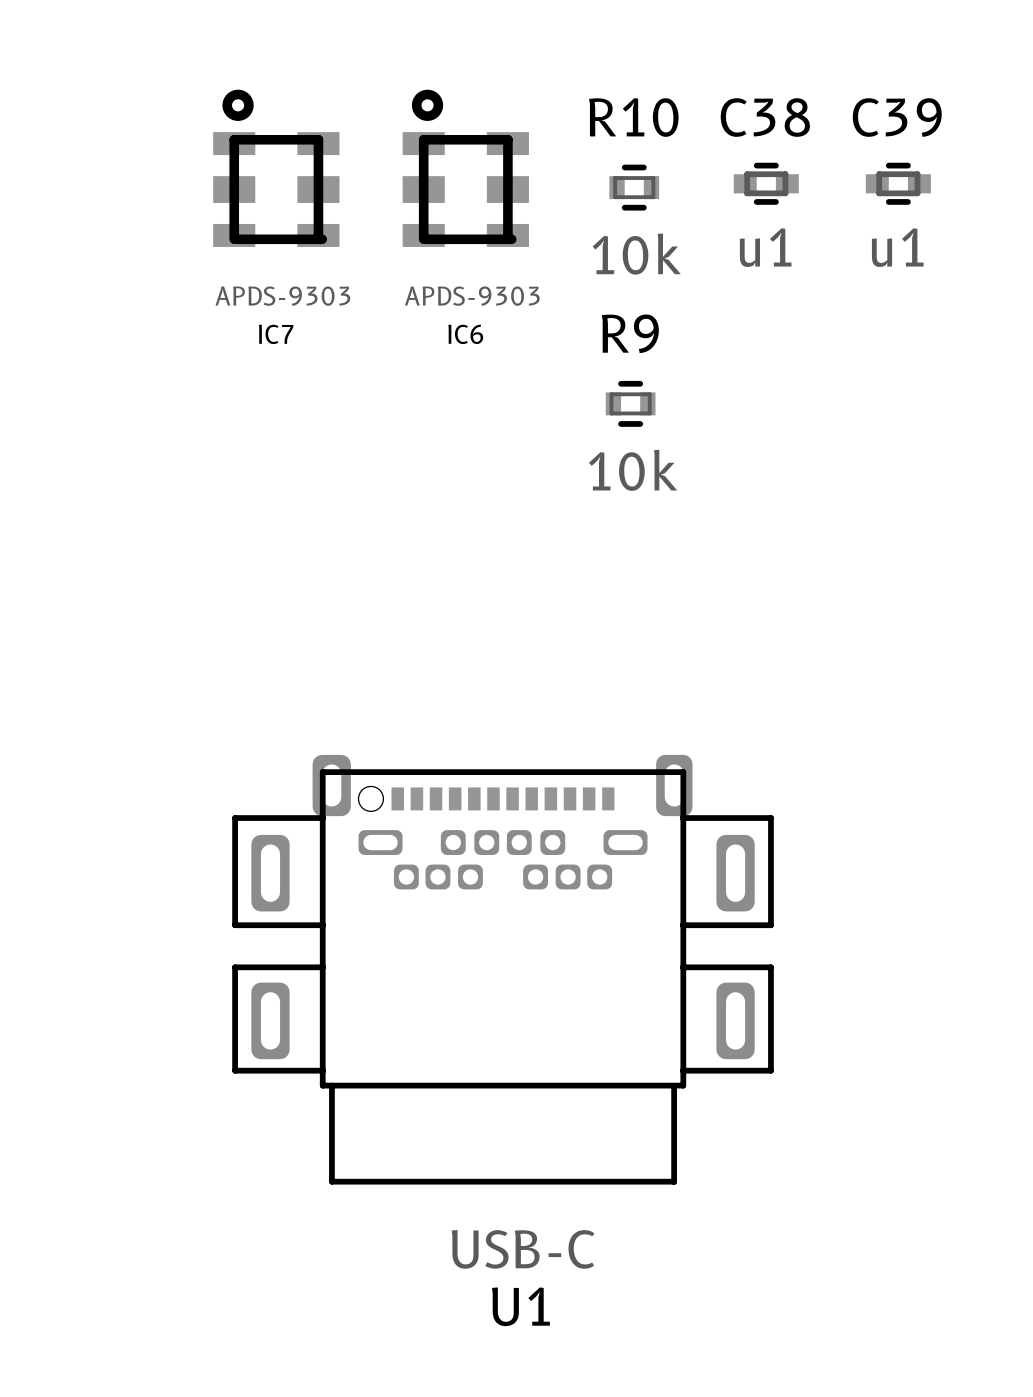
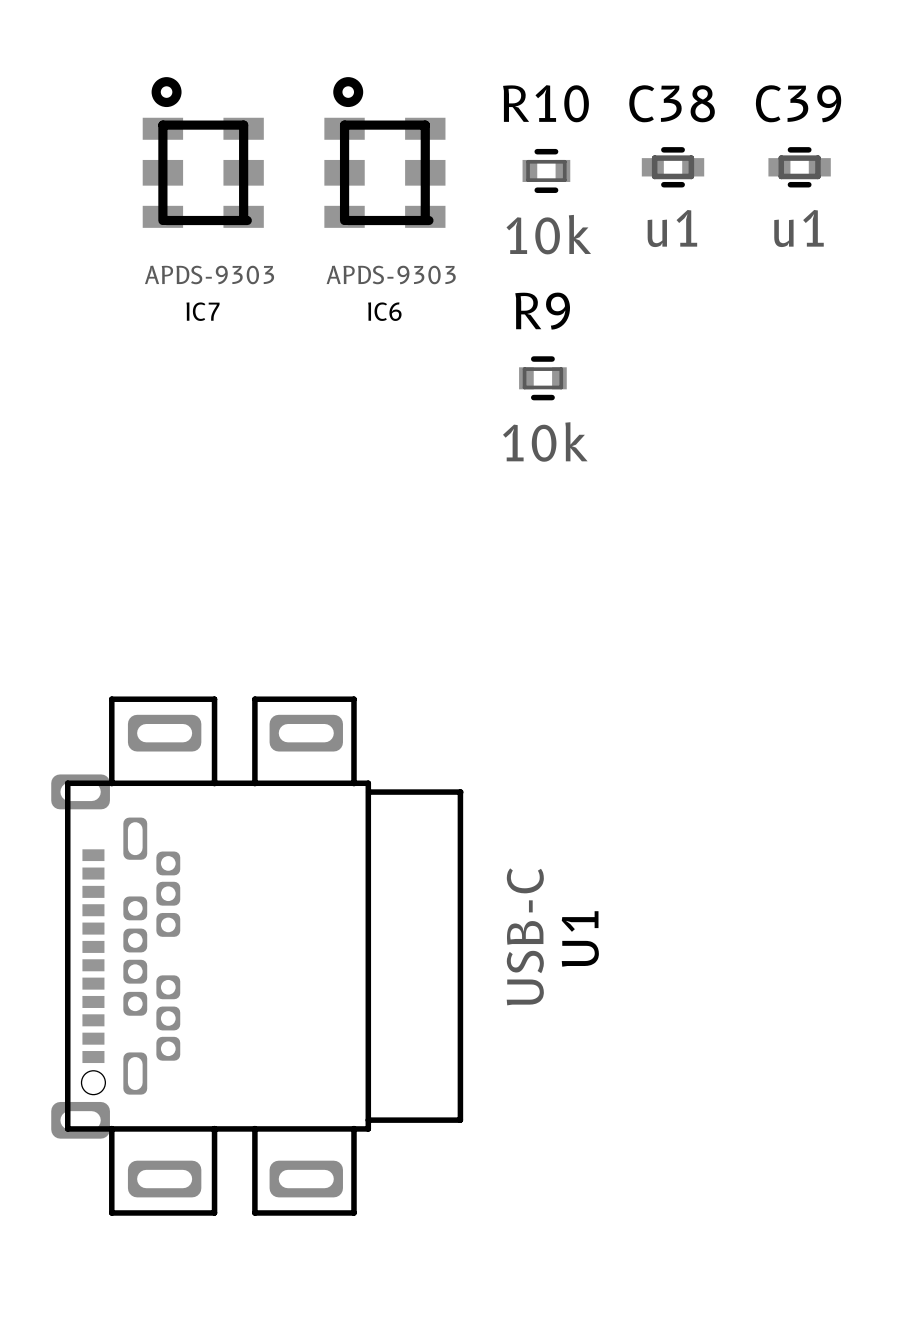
U1 rotation: 0° (503, 969) -> 90° counterclockwise (257, 956)

